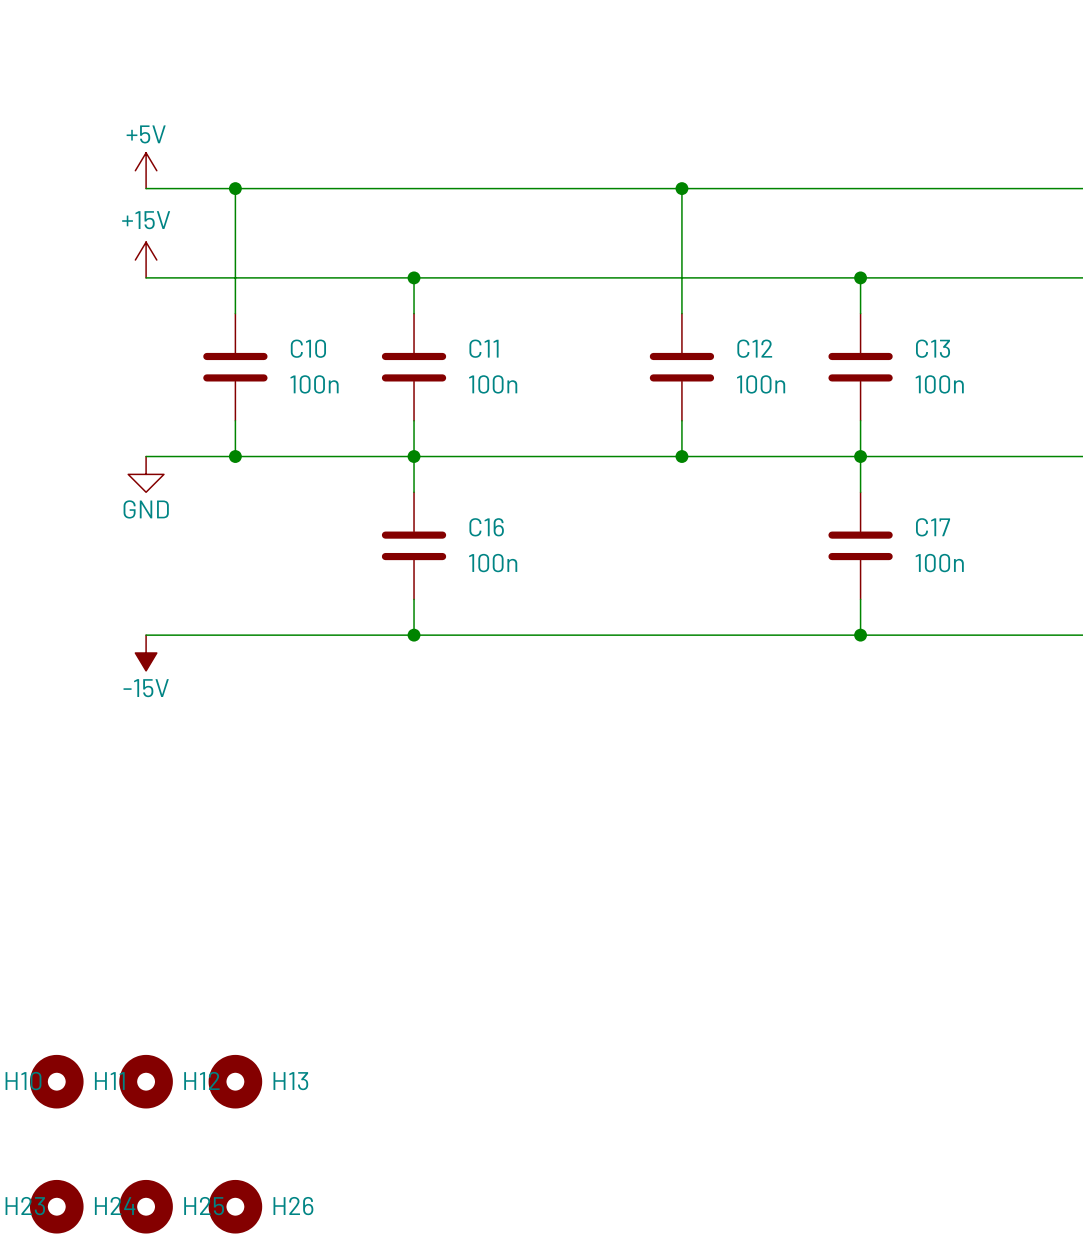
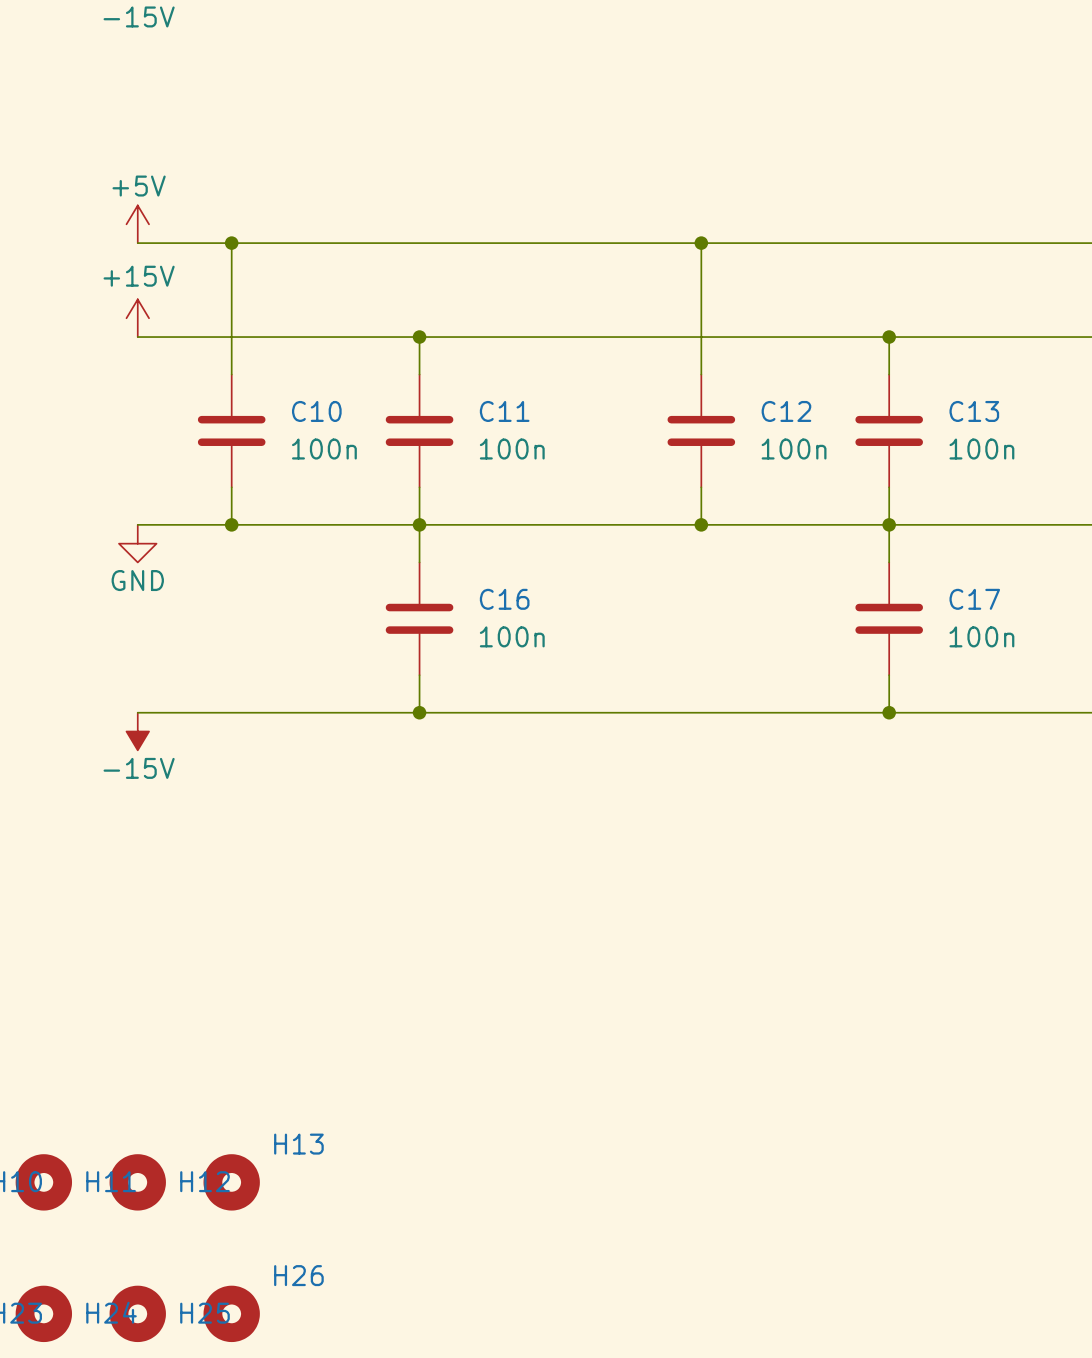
H13 name position: H13 (290, 1081) -> H13 (298, 1144)
H26 name position: H26 (293, 1206) -> H26 (298, 1275)

